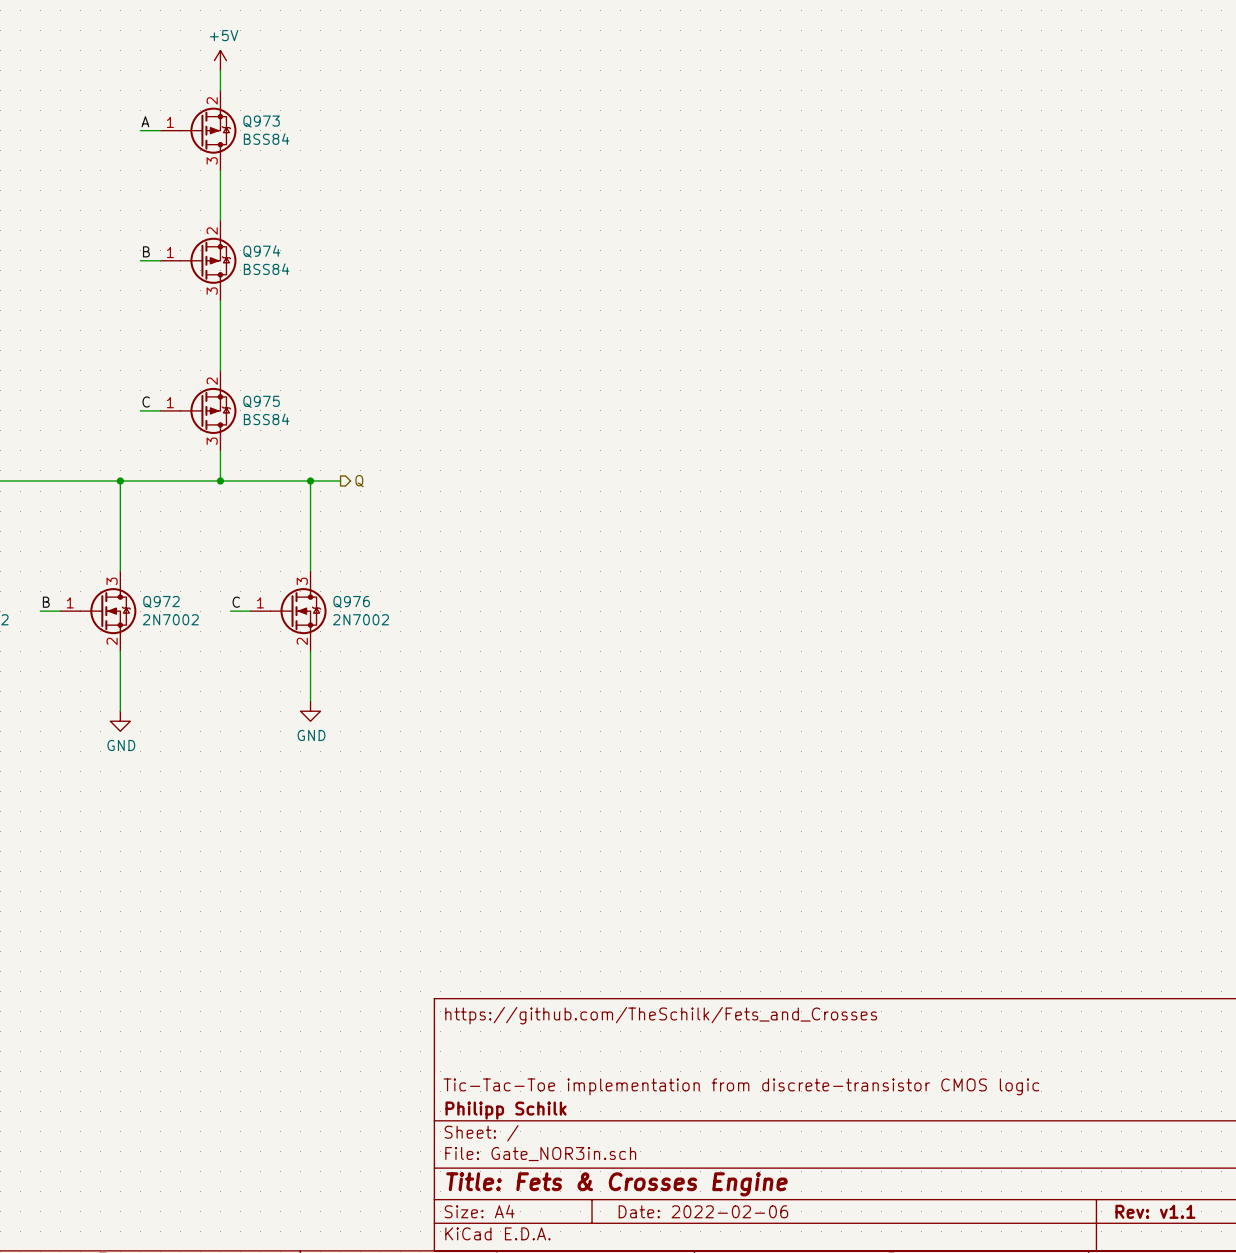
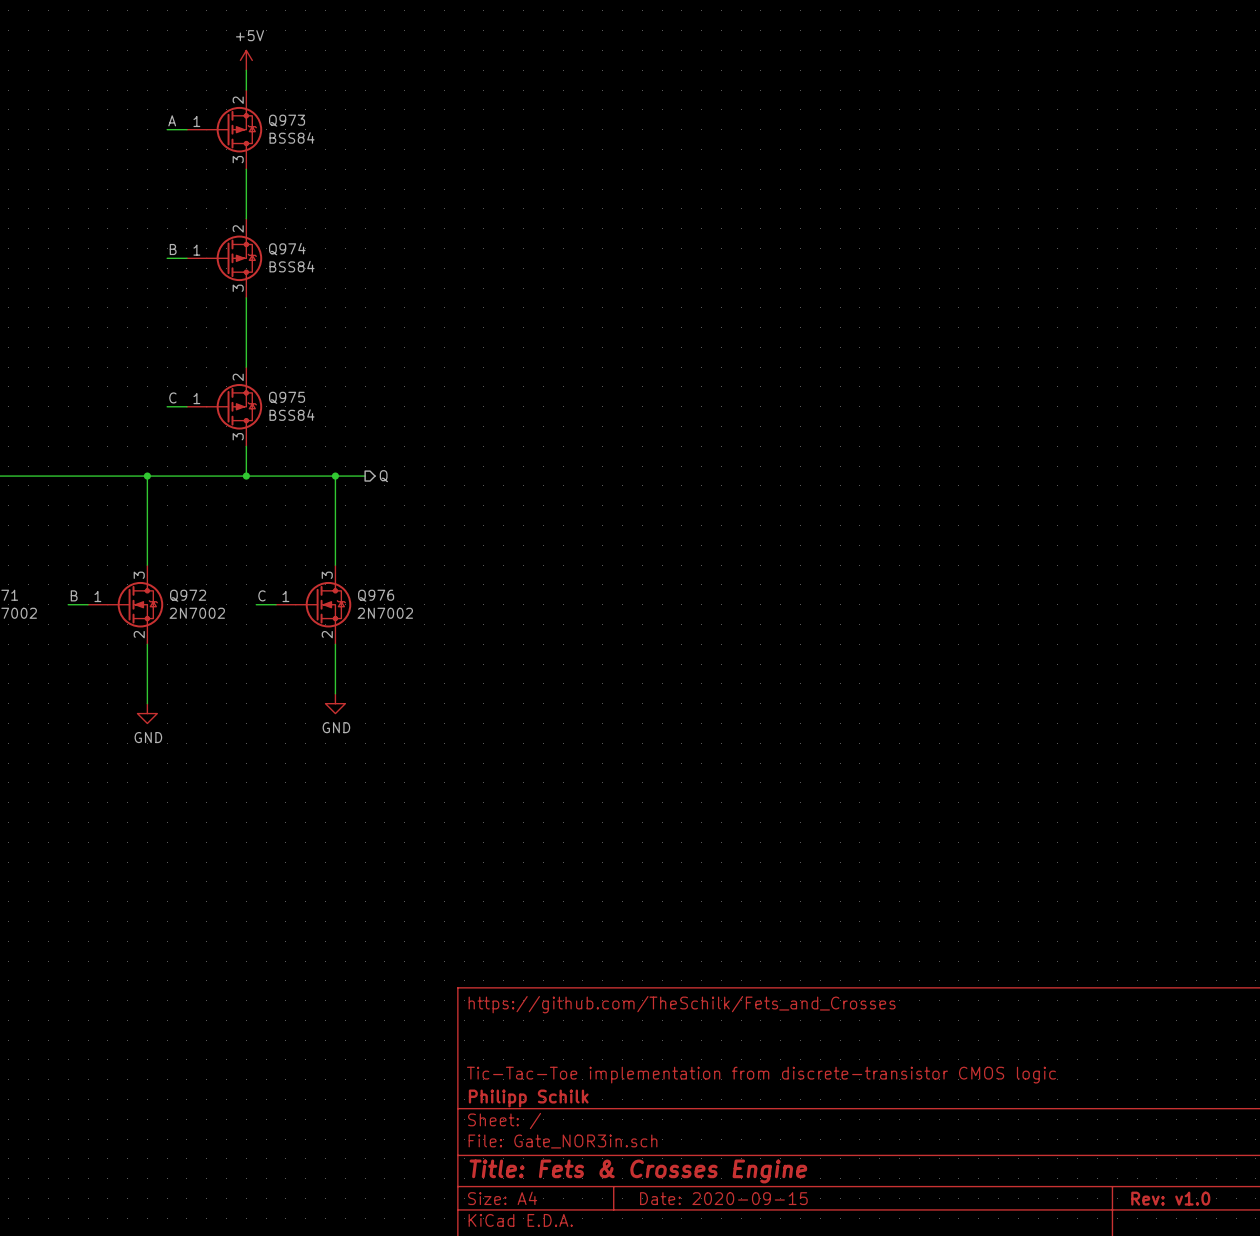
title block: Date: 2022-02-06 (703, 1211) -> Date: 2020-09-15 (723, 1198)
title block: Rev: v1.1 (1155, 1211) -> Rev: v1.0 (1170, 1198)

